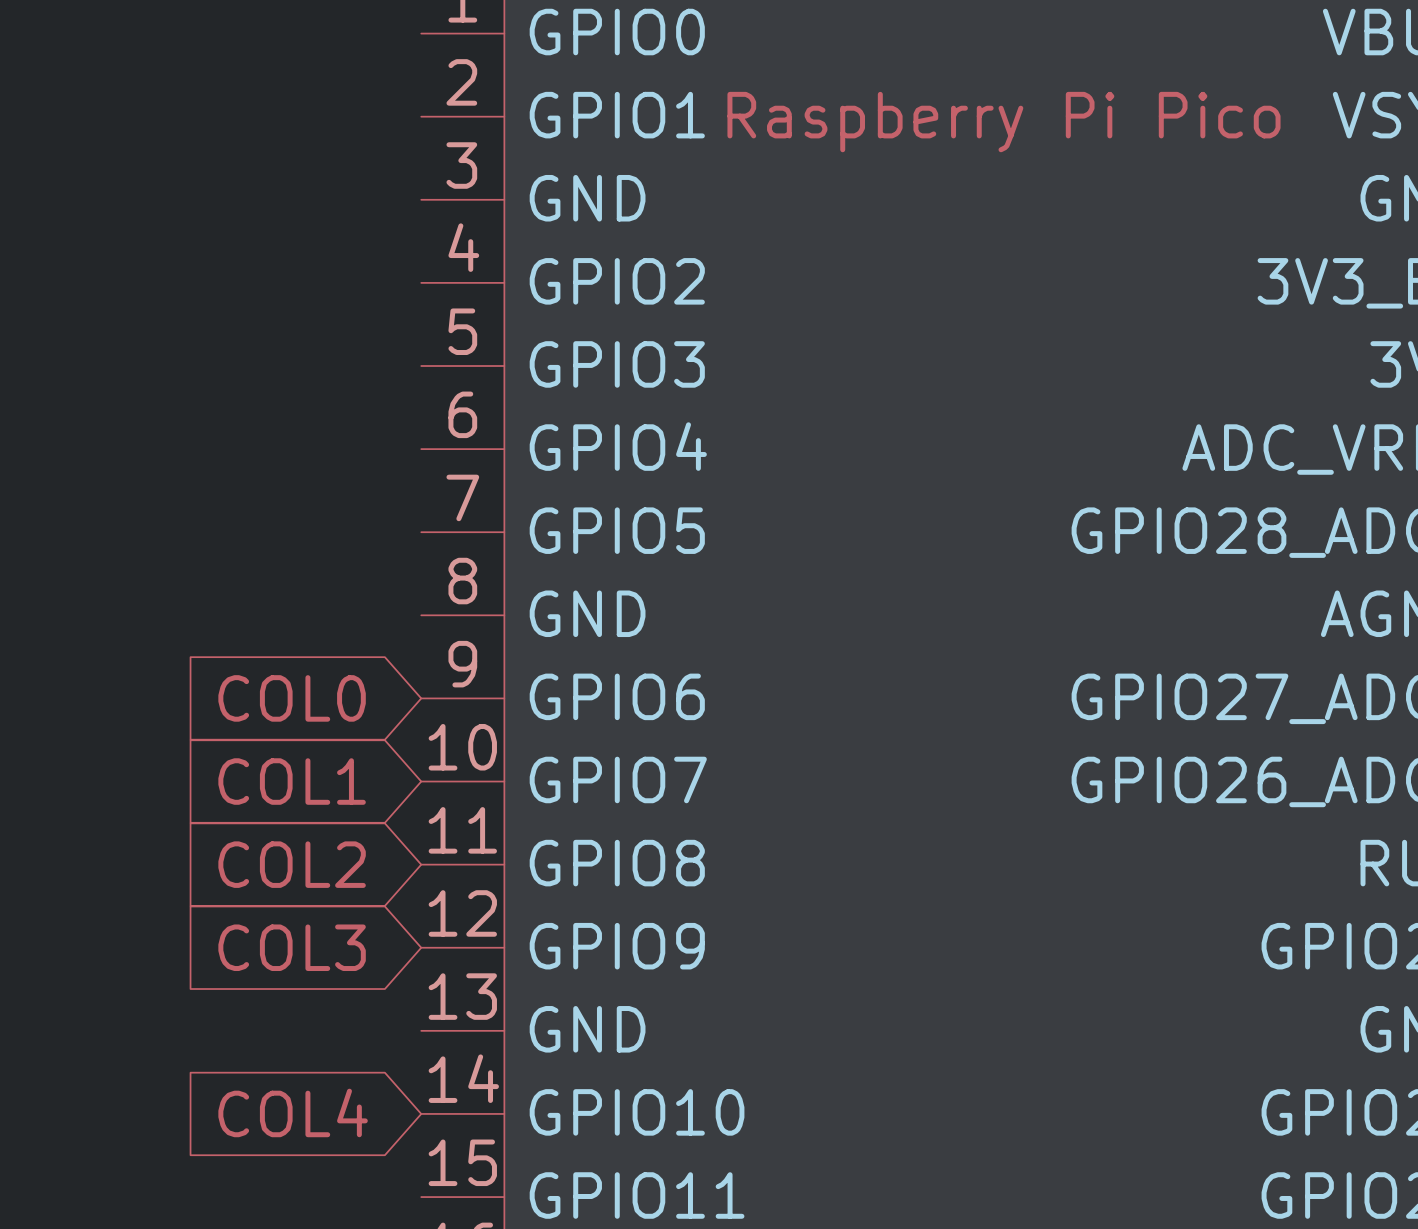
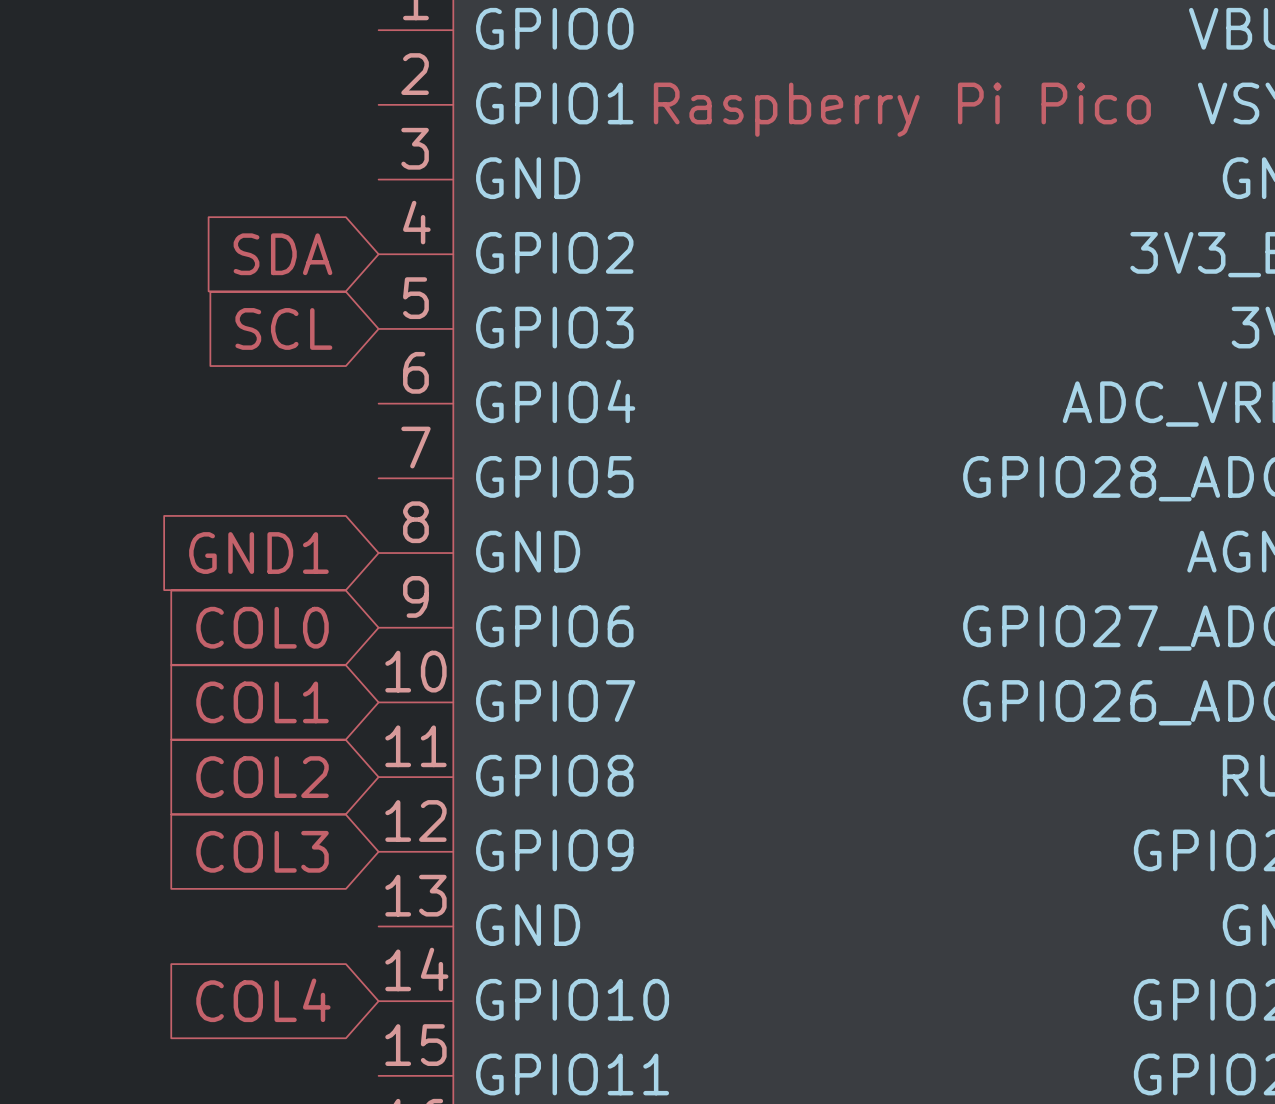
global label: none -> SDA (282, 254)
global label: none -> SCL (283, 328)
global label: none -> GND1 (258, 553)

